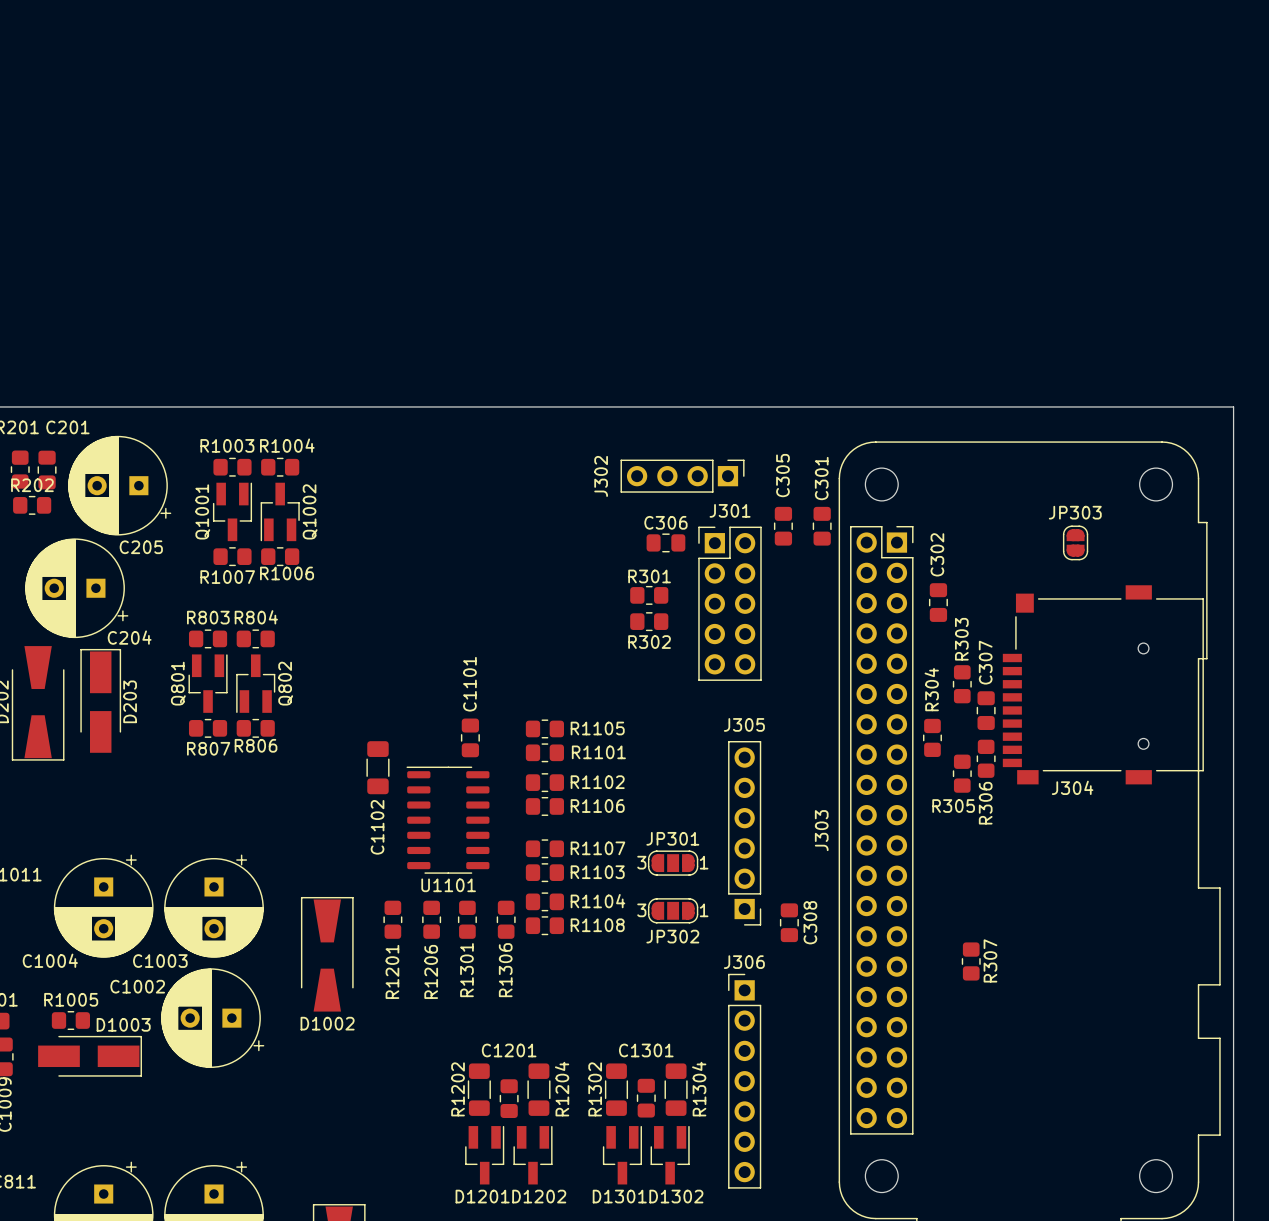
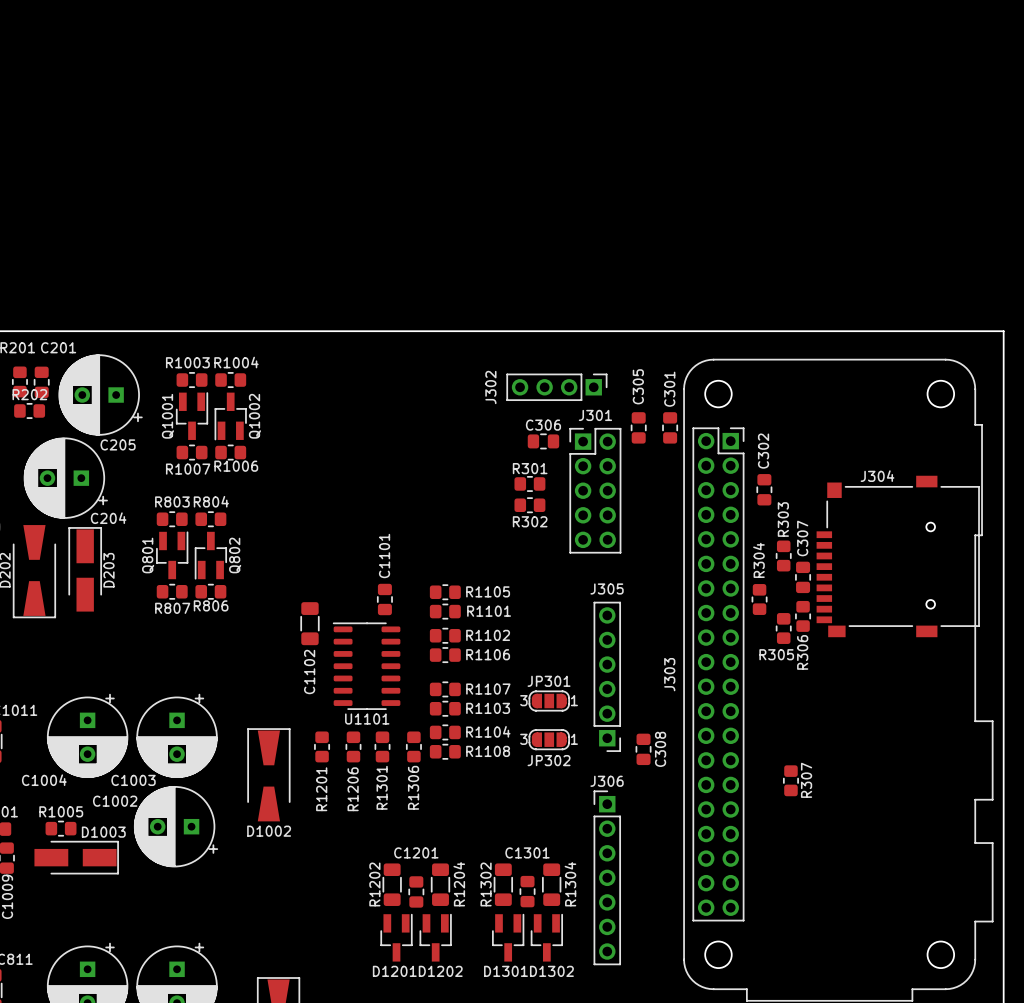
JP303: (1075, 542) -> none
J304 name position: J304 (1072, 787) -> J304 (877, 476)

